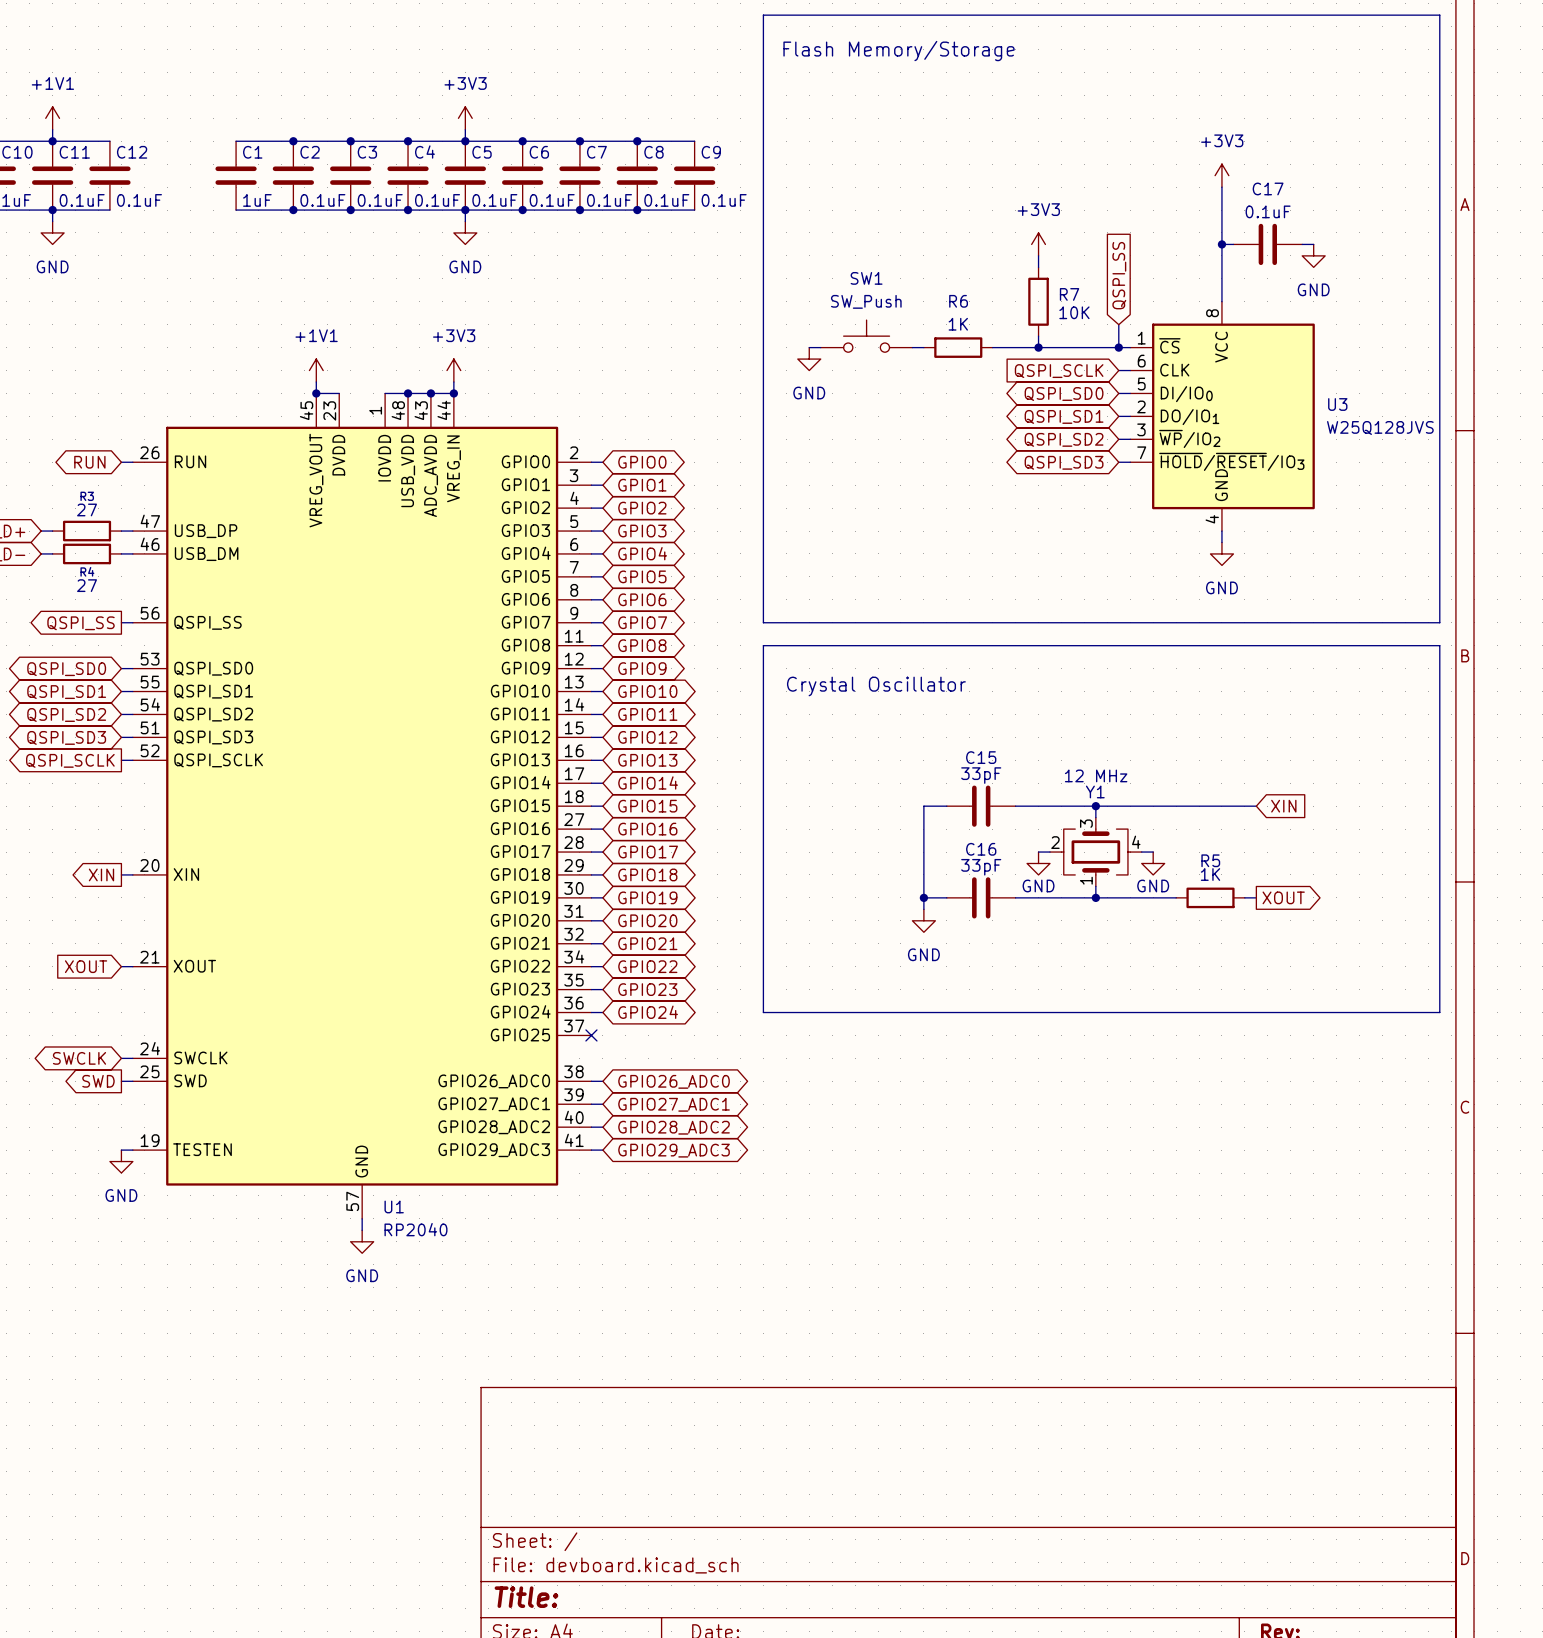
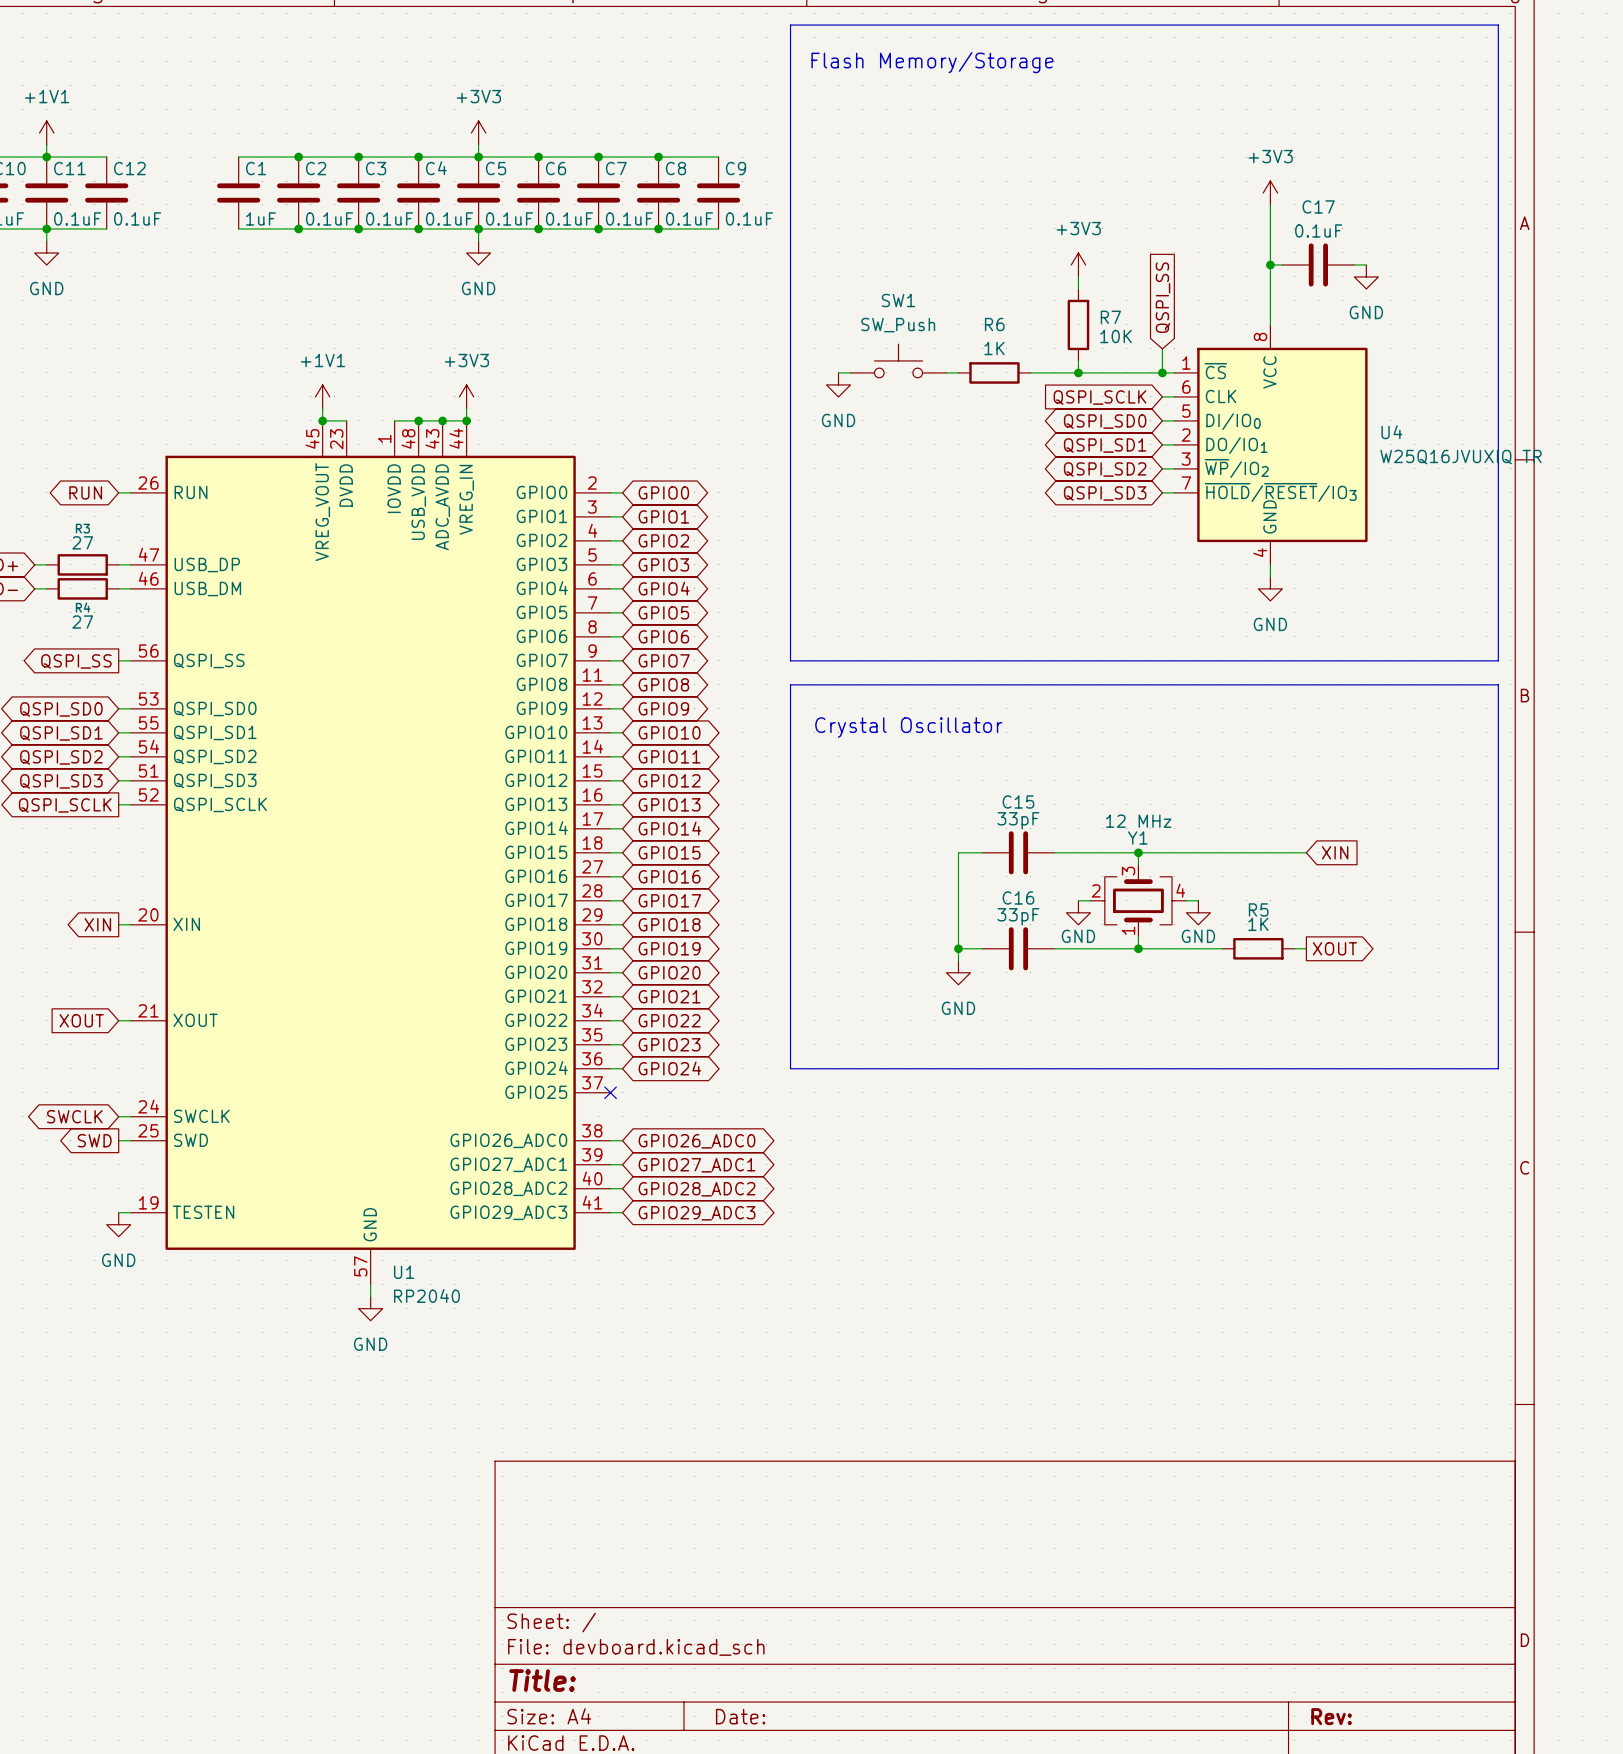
U3 name: U3 (1337, 404) -> U4 (1391, 432)
U3 value: W25Q128JVS (1380, 427) -> W25Q16JVUXIQ TR (1461, 457)

